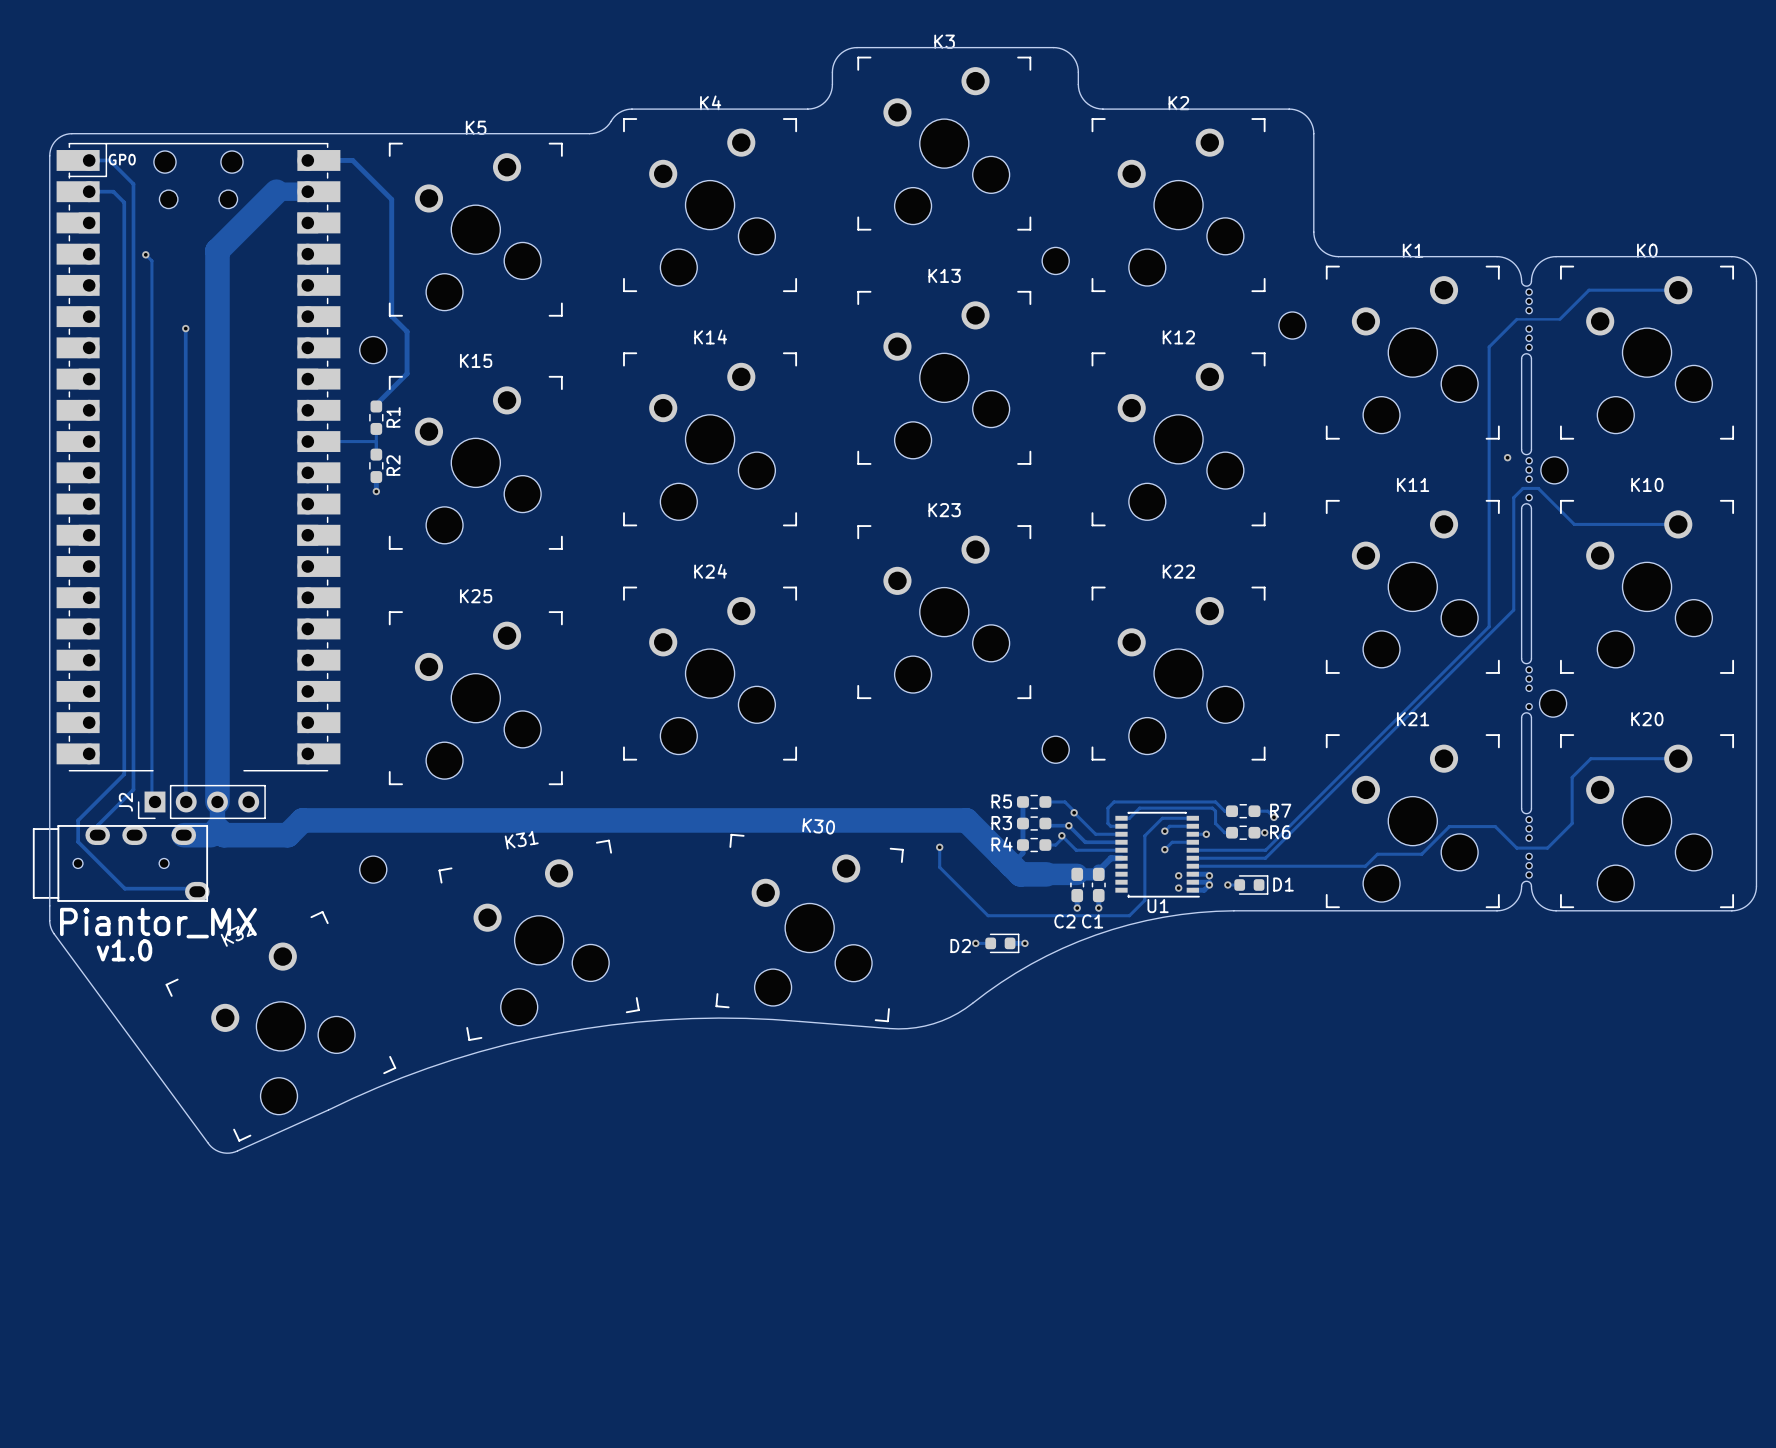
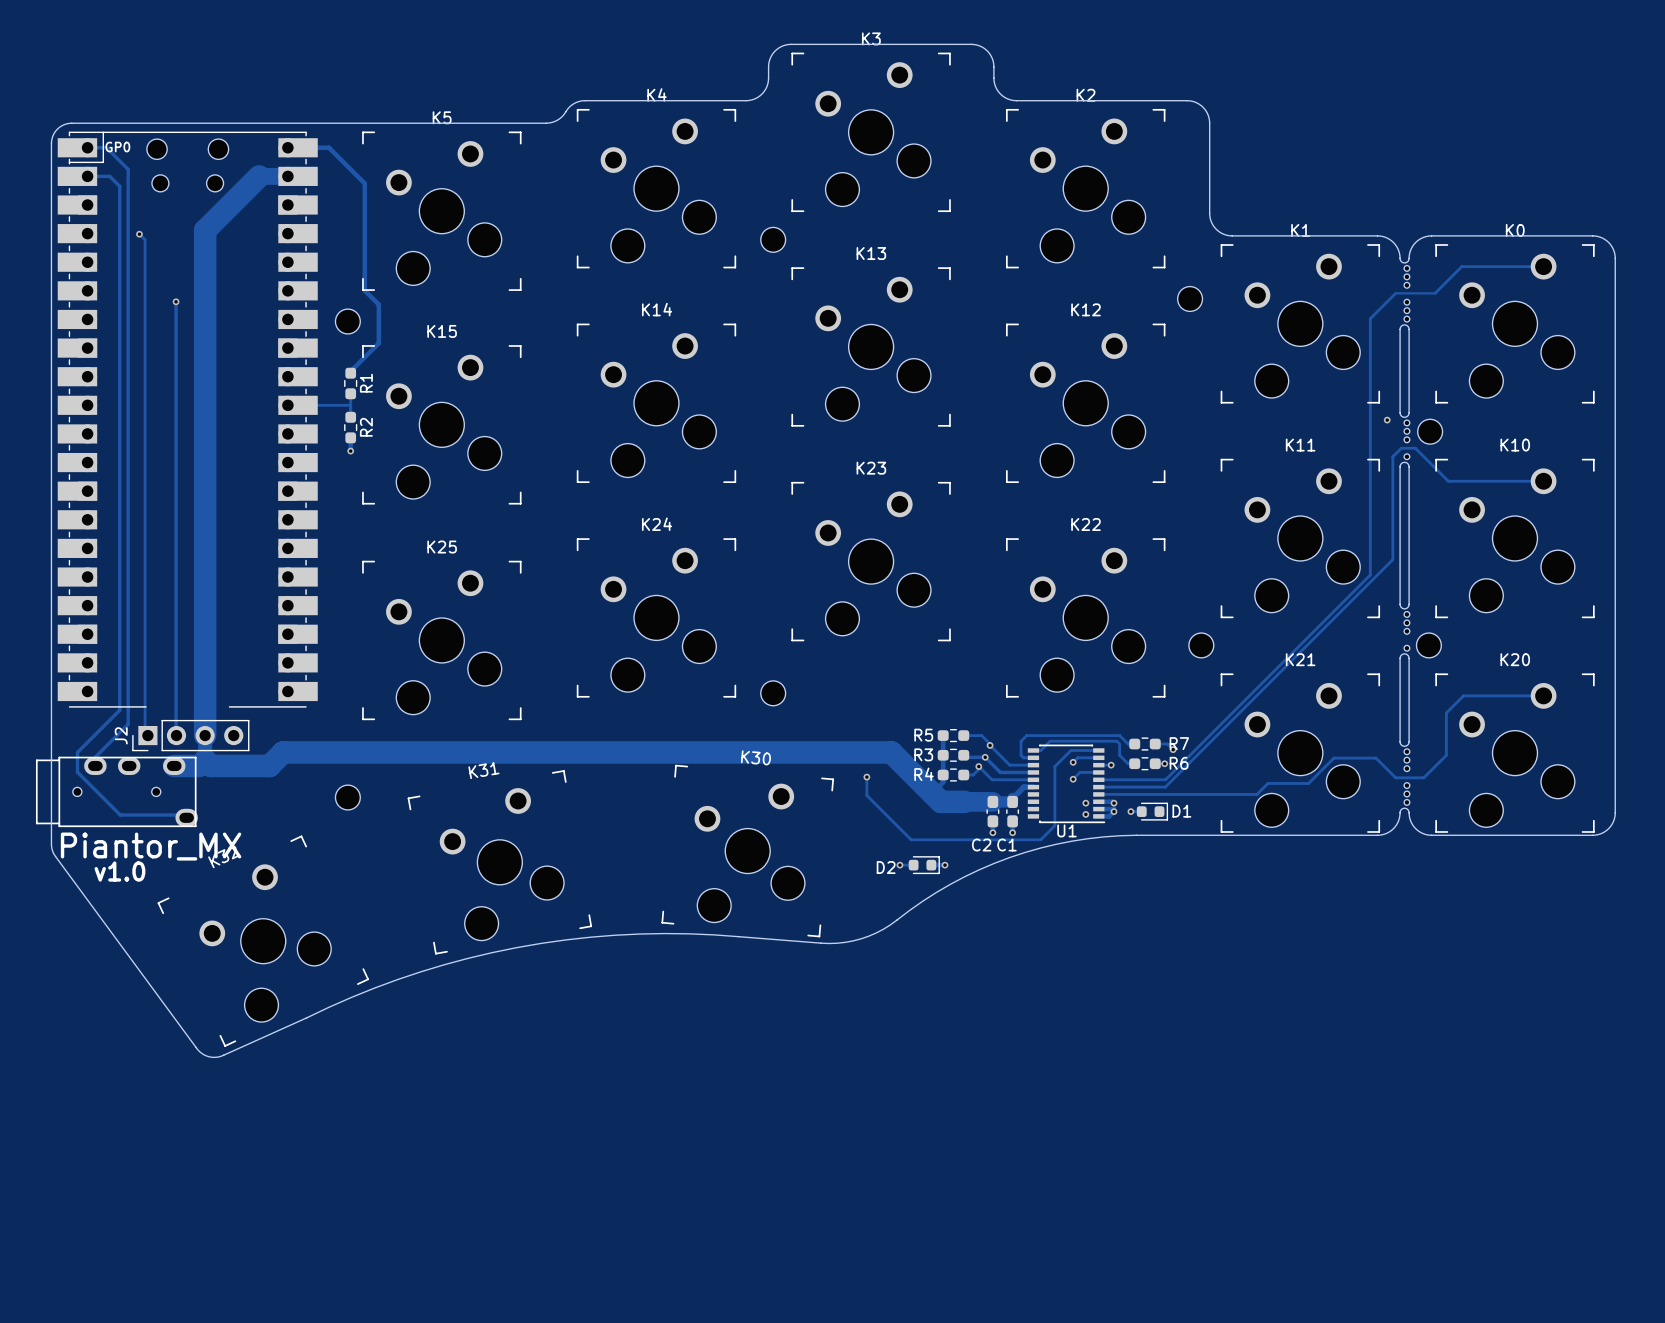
part position: (1055, 260) -> (773, 239)
part: none -> (1201, 645)
part: (1055, 749) -> none
part: none -> (773, 693)

